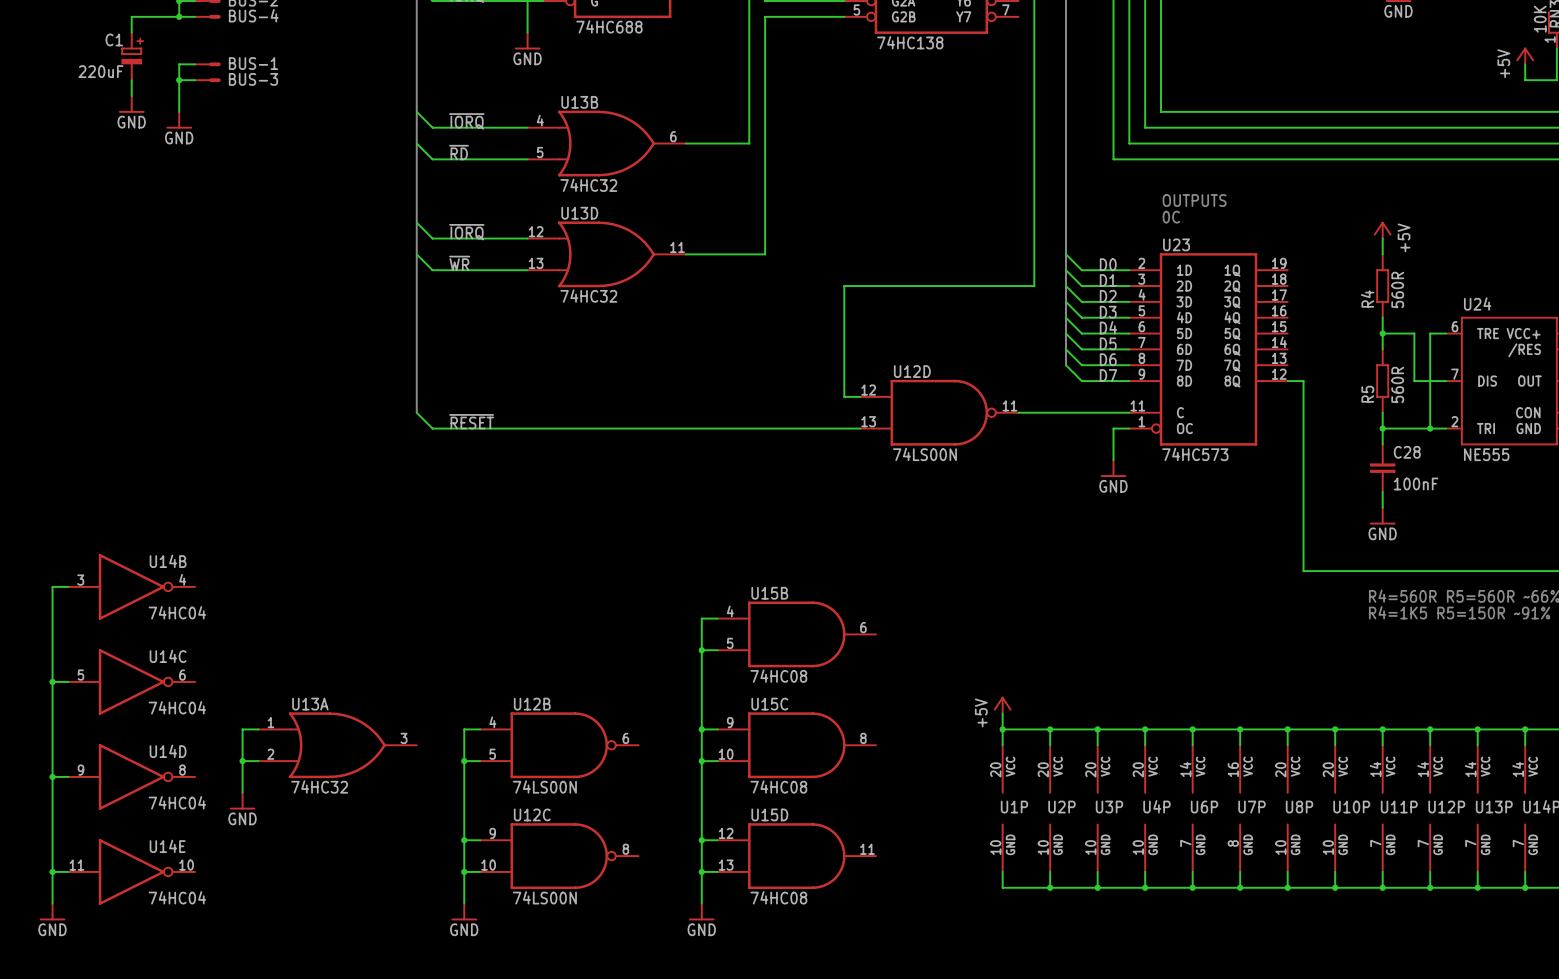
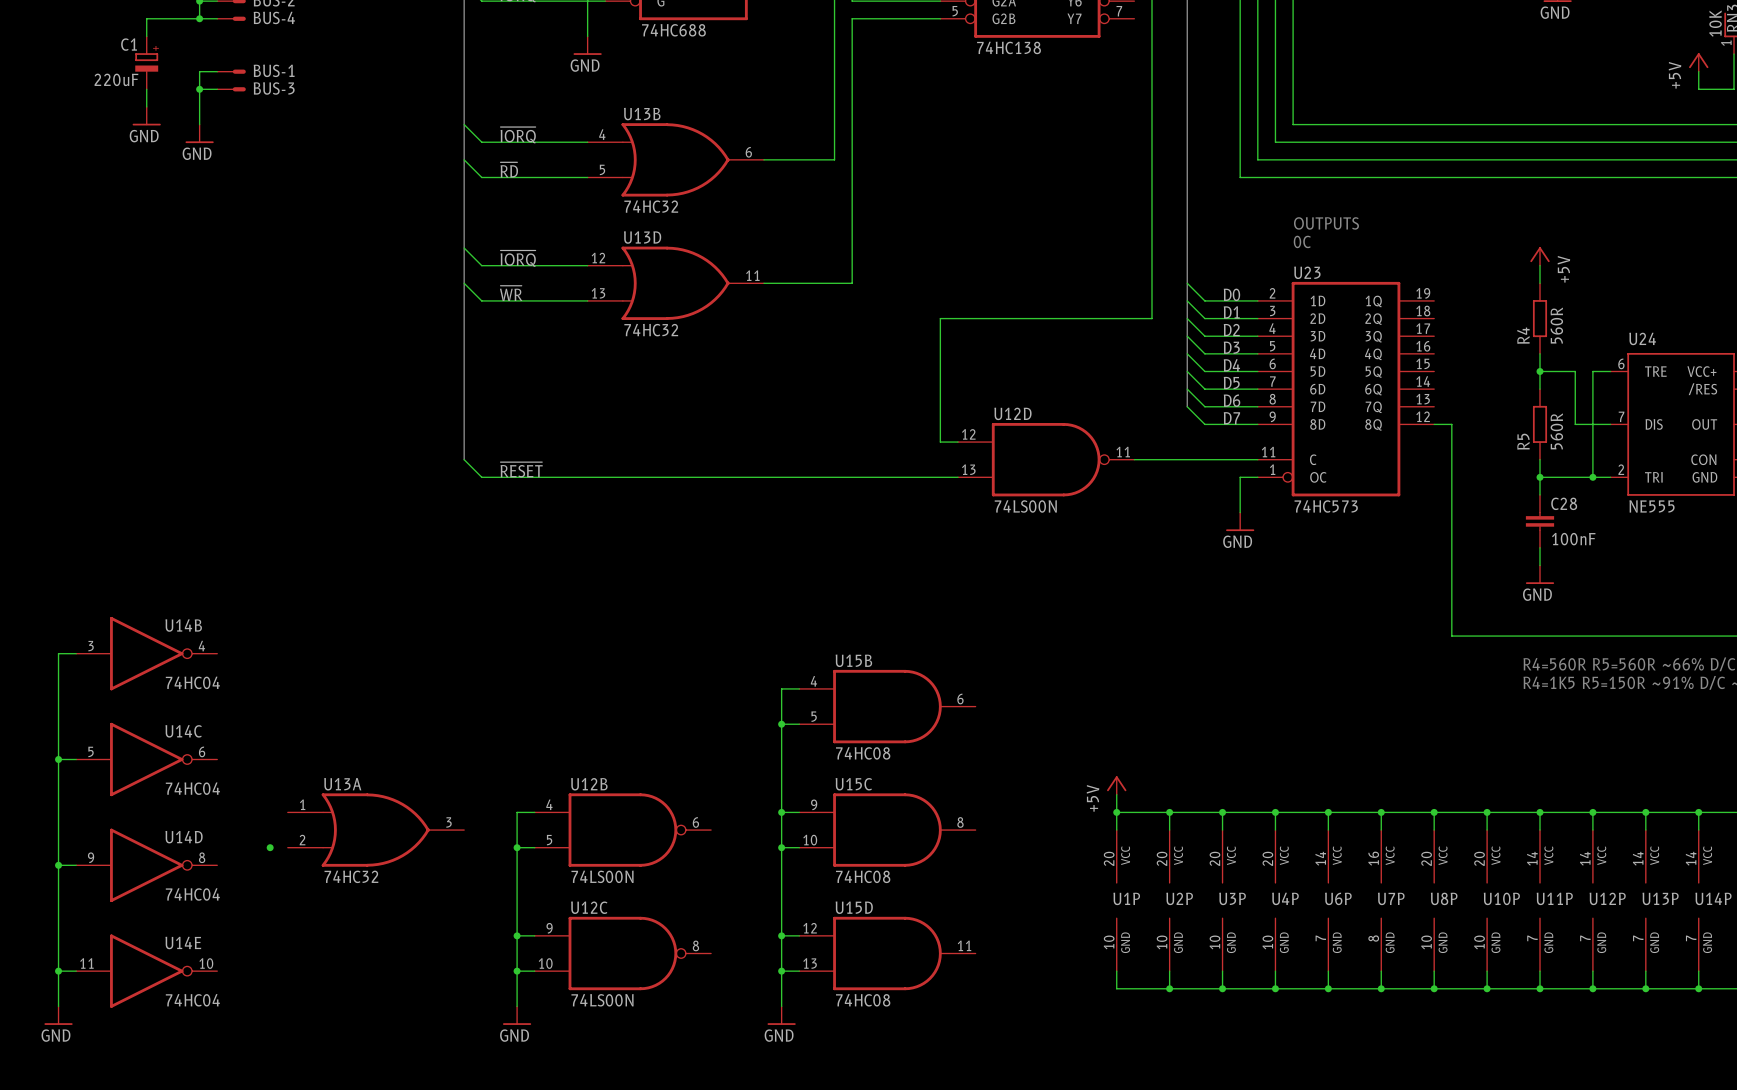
wire: (258, 729) (242, 729) (242, 792) -> none
wire: (242, 761) (258, 761) -> none
power symbol: GND (242, 801) -> none

